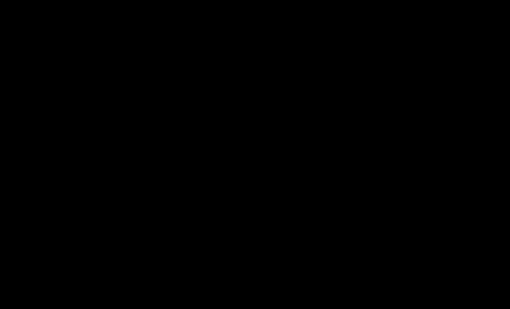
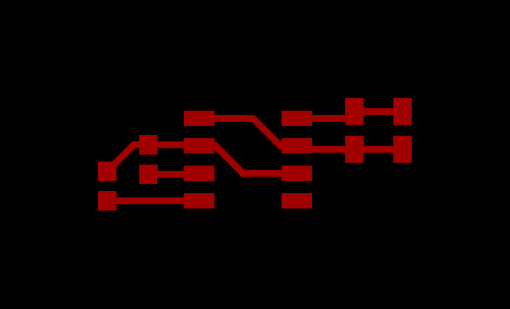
top track: none -> (402, 111) (354, 111) (347, 118) (296, 118)
top track: none -> (199, 118) (253, 118) (280, 145) (296, 145) (300, 149) (402, 149)
part: none -> (354, 130)
part: none -> (402, 130)
part: none -> (148, 159)
part: none -> (247, 159)
top track: none -> (107, 171) (133, 144) (198, 144) (215, 145) (242, 173) (296, 173)
top track: none -> (199, 173) (148, 174)
part: none -> (107, 186)
top track: none -> (199, 200) (107, 200)

